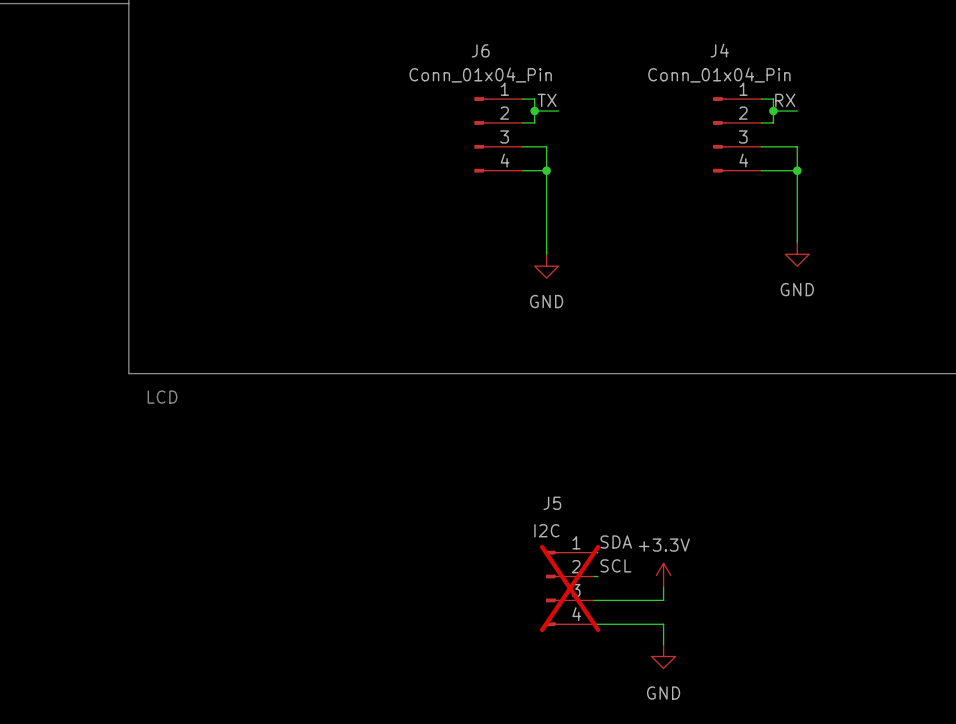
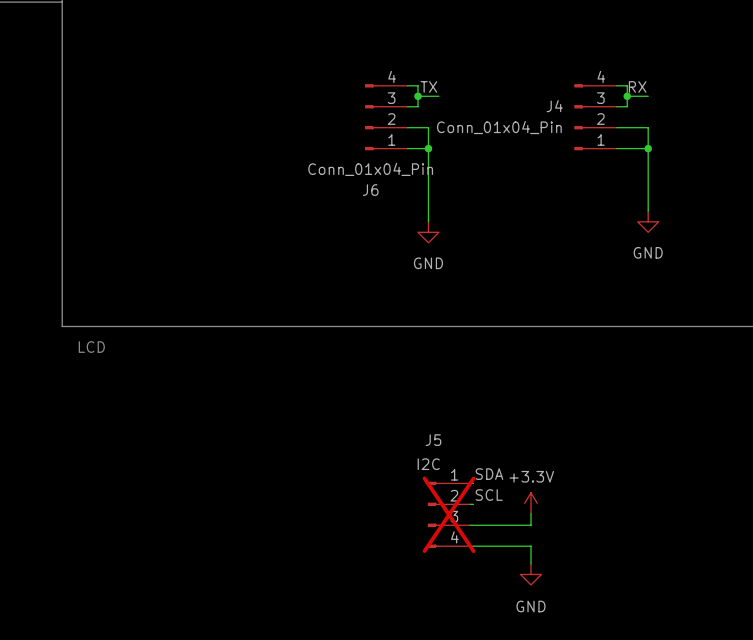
J4 name position: J4 (719, 50) -> J4 (554, 106)
J4 value position: Conn_01x04_Pin (719, 75) -> Conn_01x04_Pin (499, 127)
J6 flip: as is (480, 134) -> up-down (370, 117)
J4 flip: as is (719, 134) -> up-down (580, 117)

